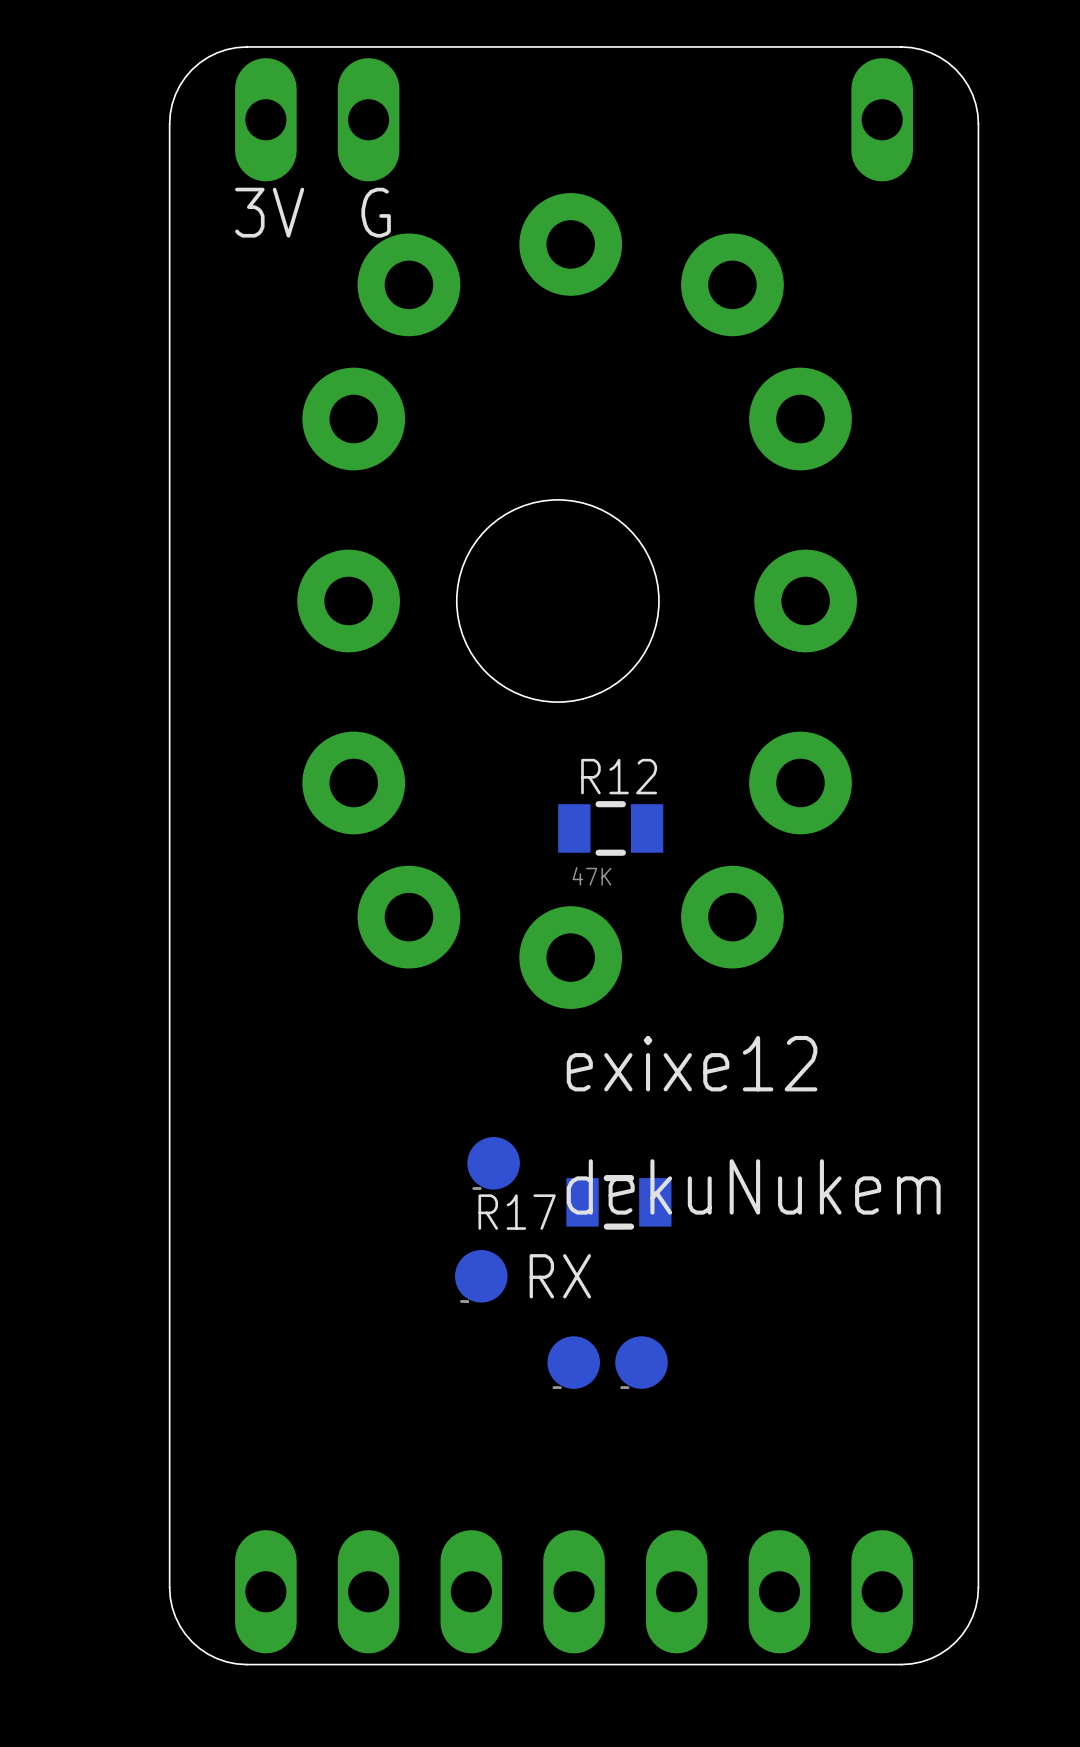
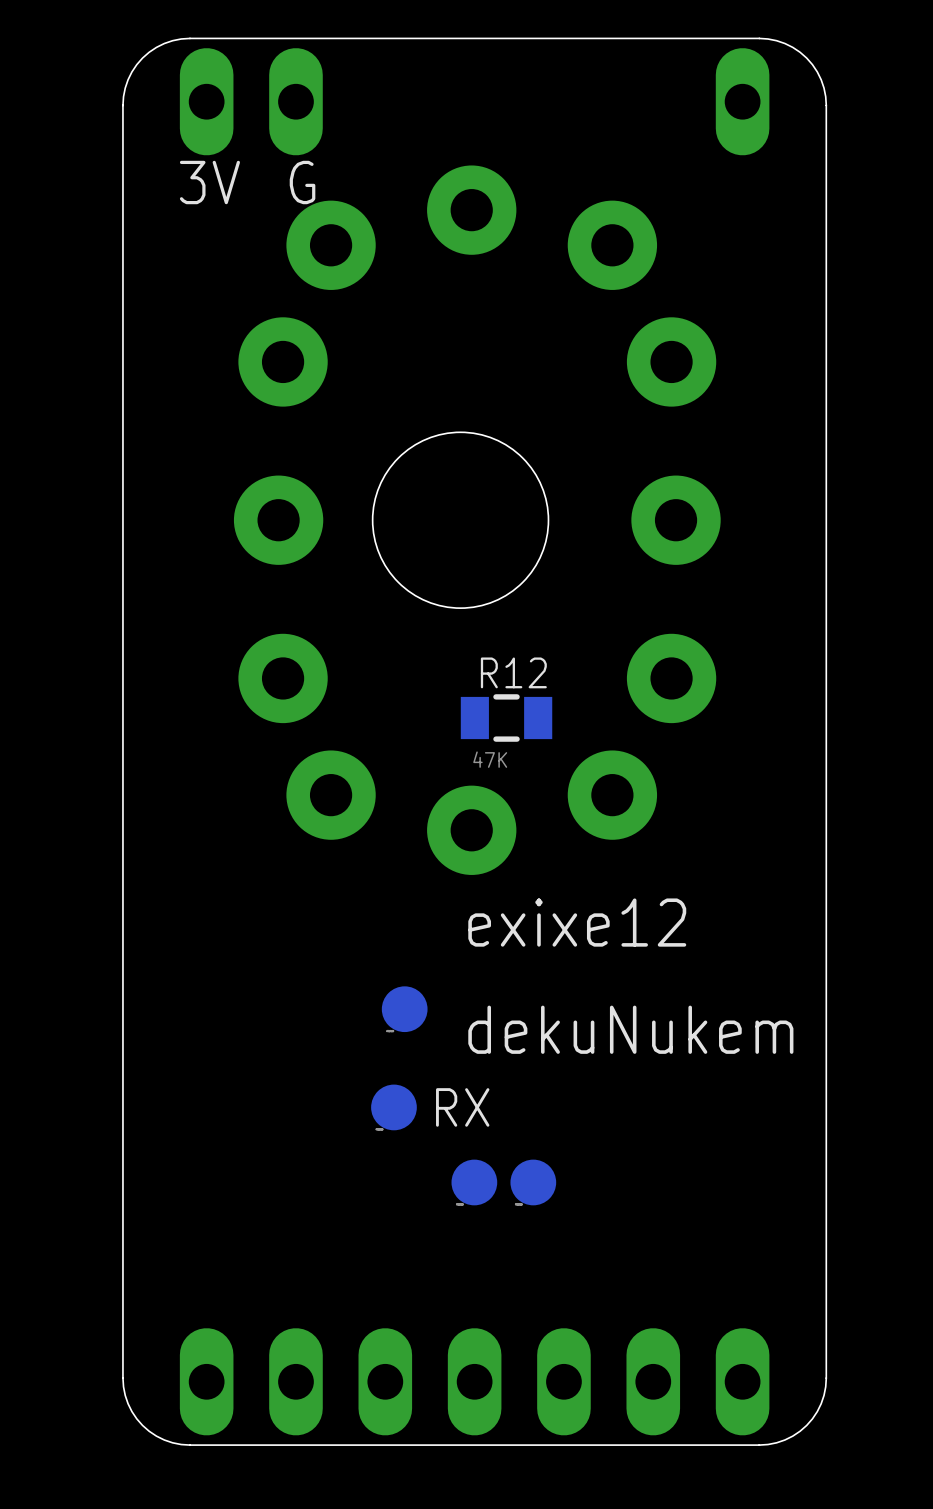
R17: (618, 1202) -> none

